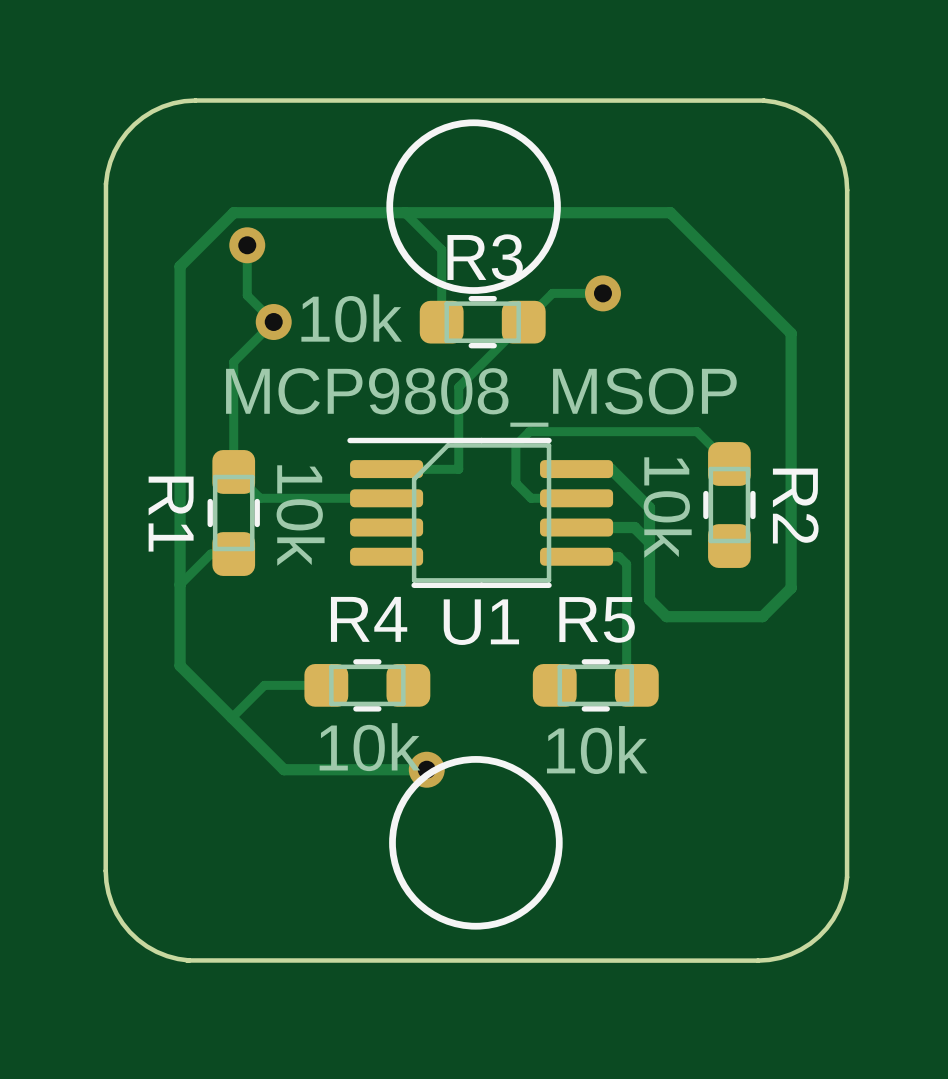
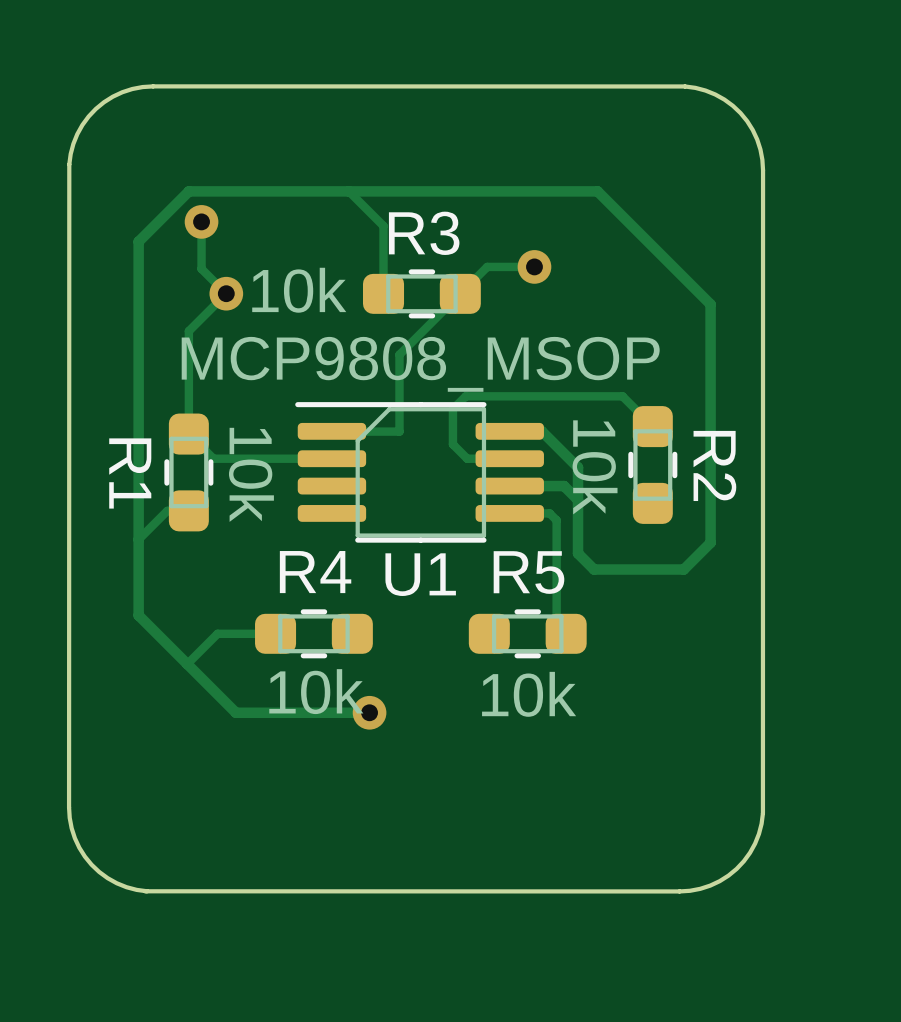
drawing: [386, 119, 561, 294] -> none
drawing: [389, 756, 563, 930] -> none

